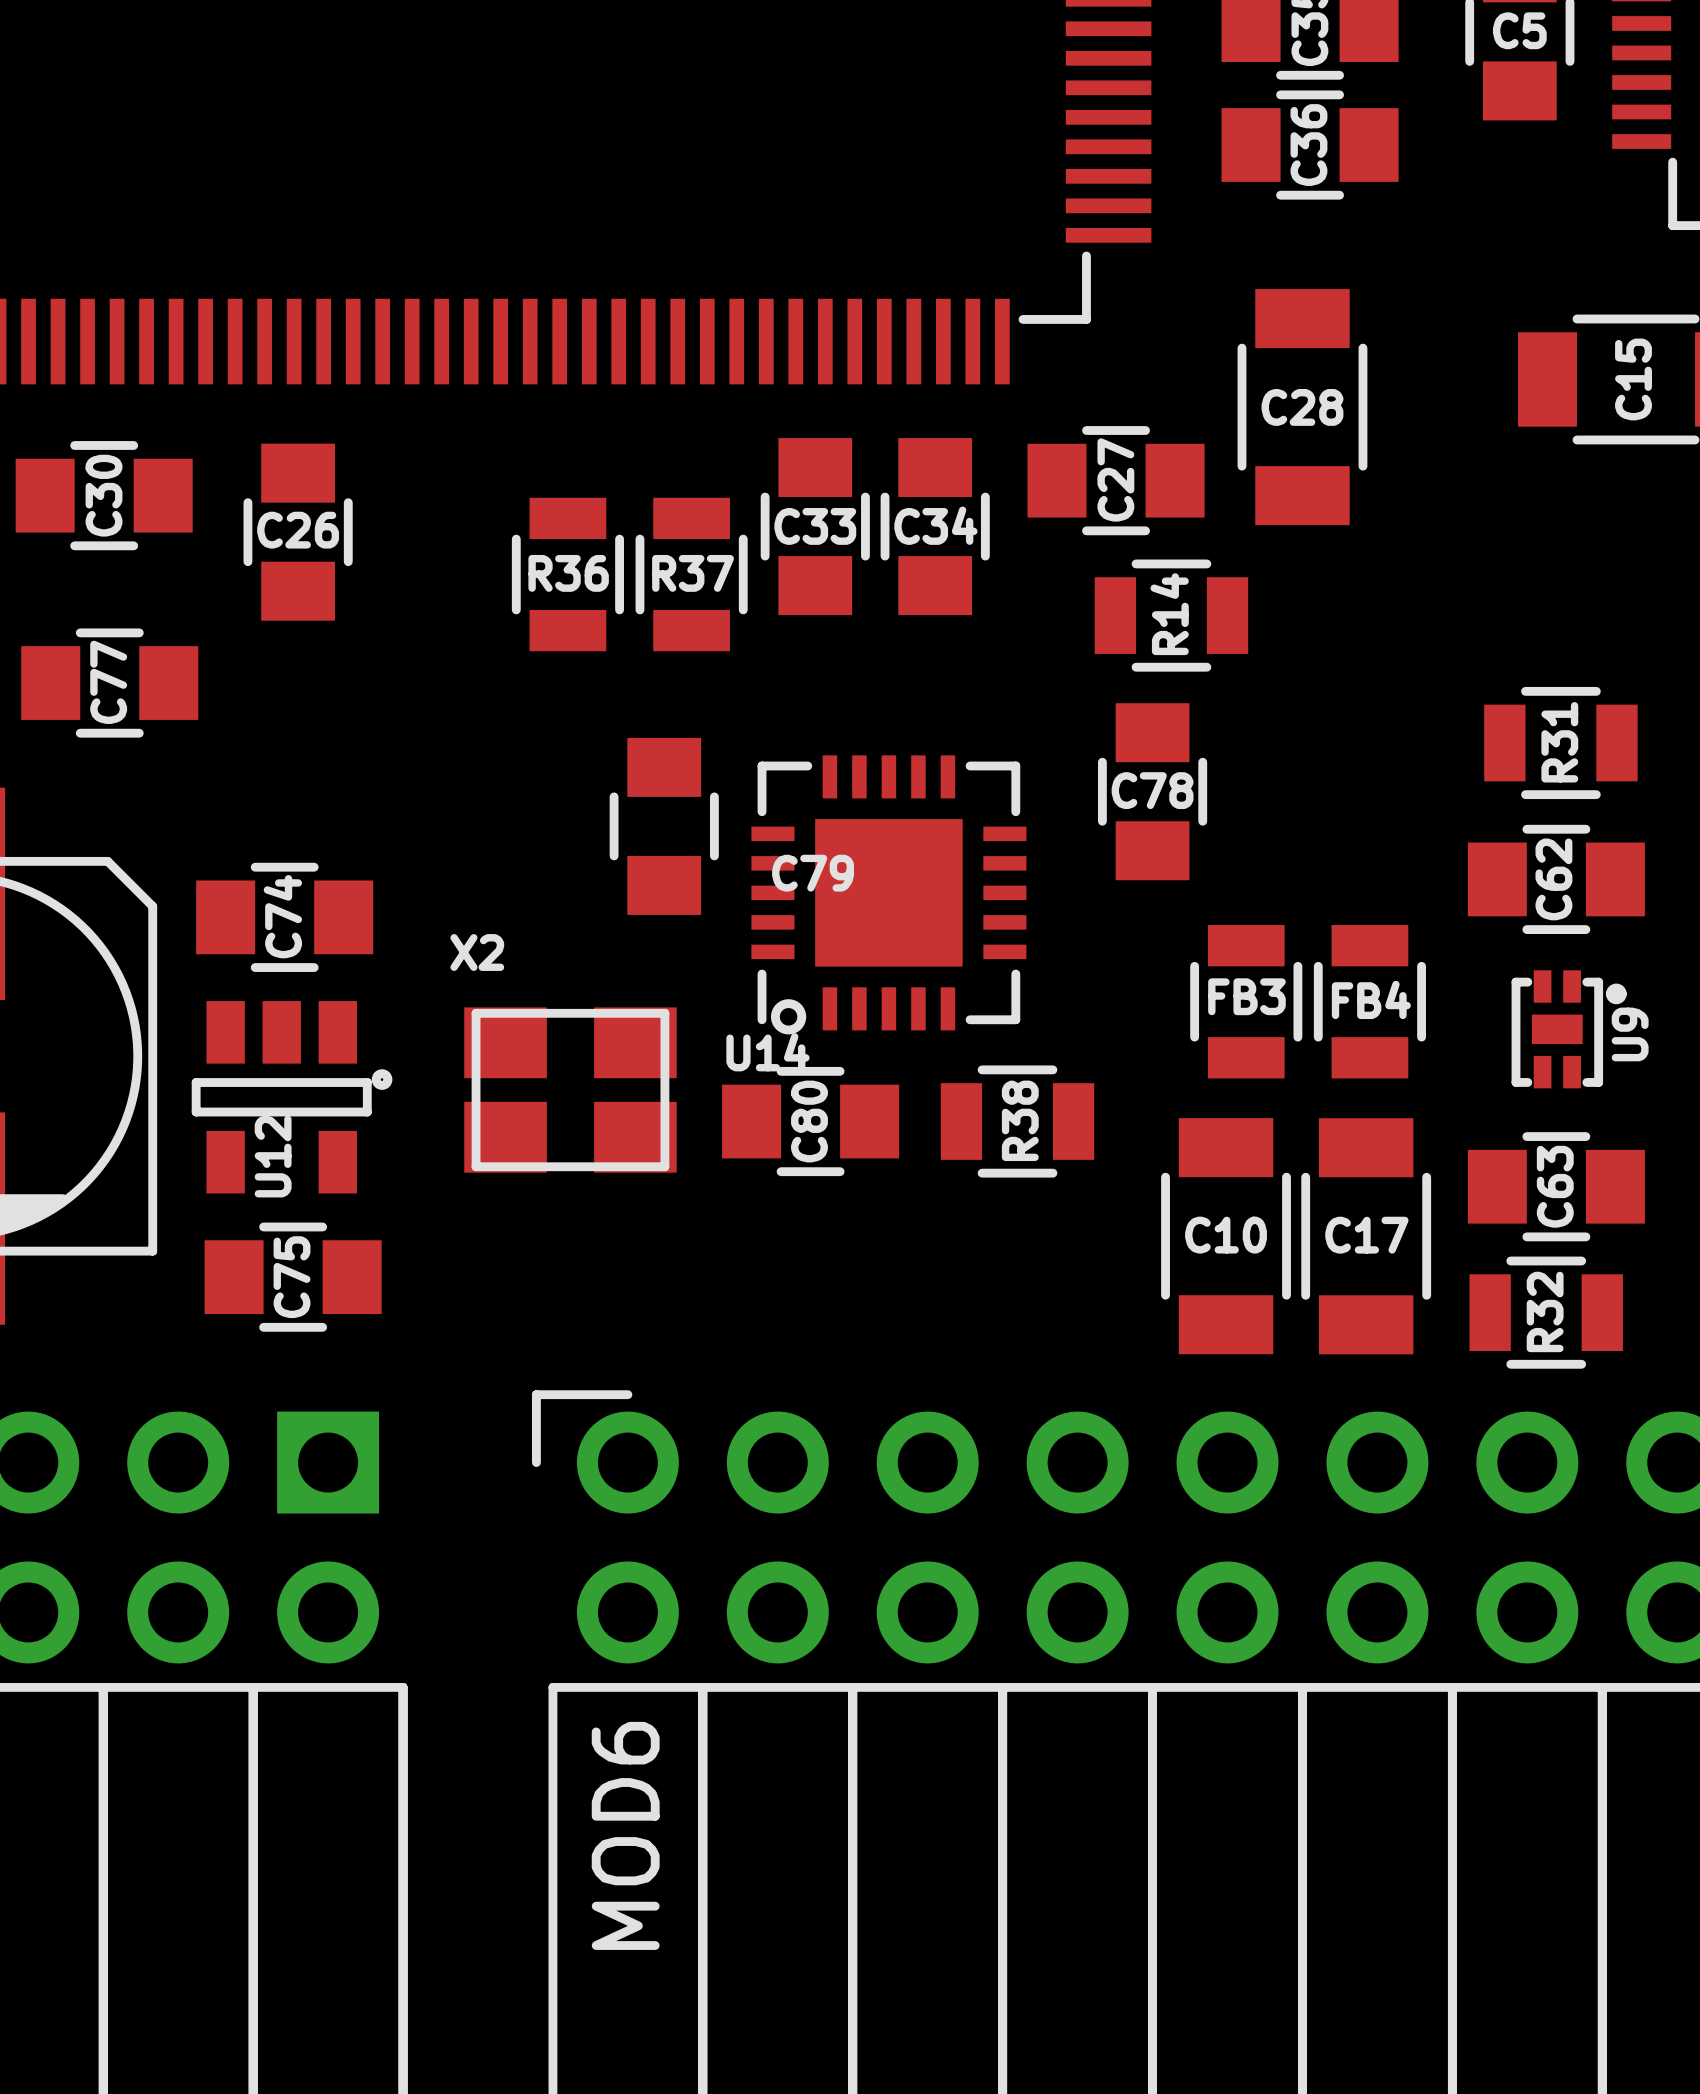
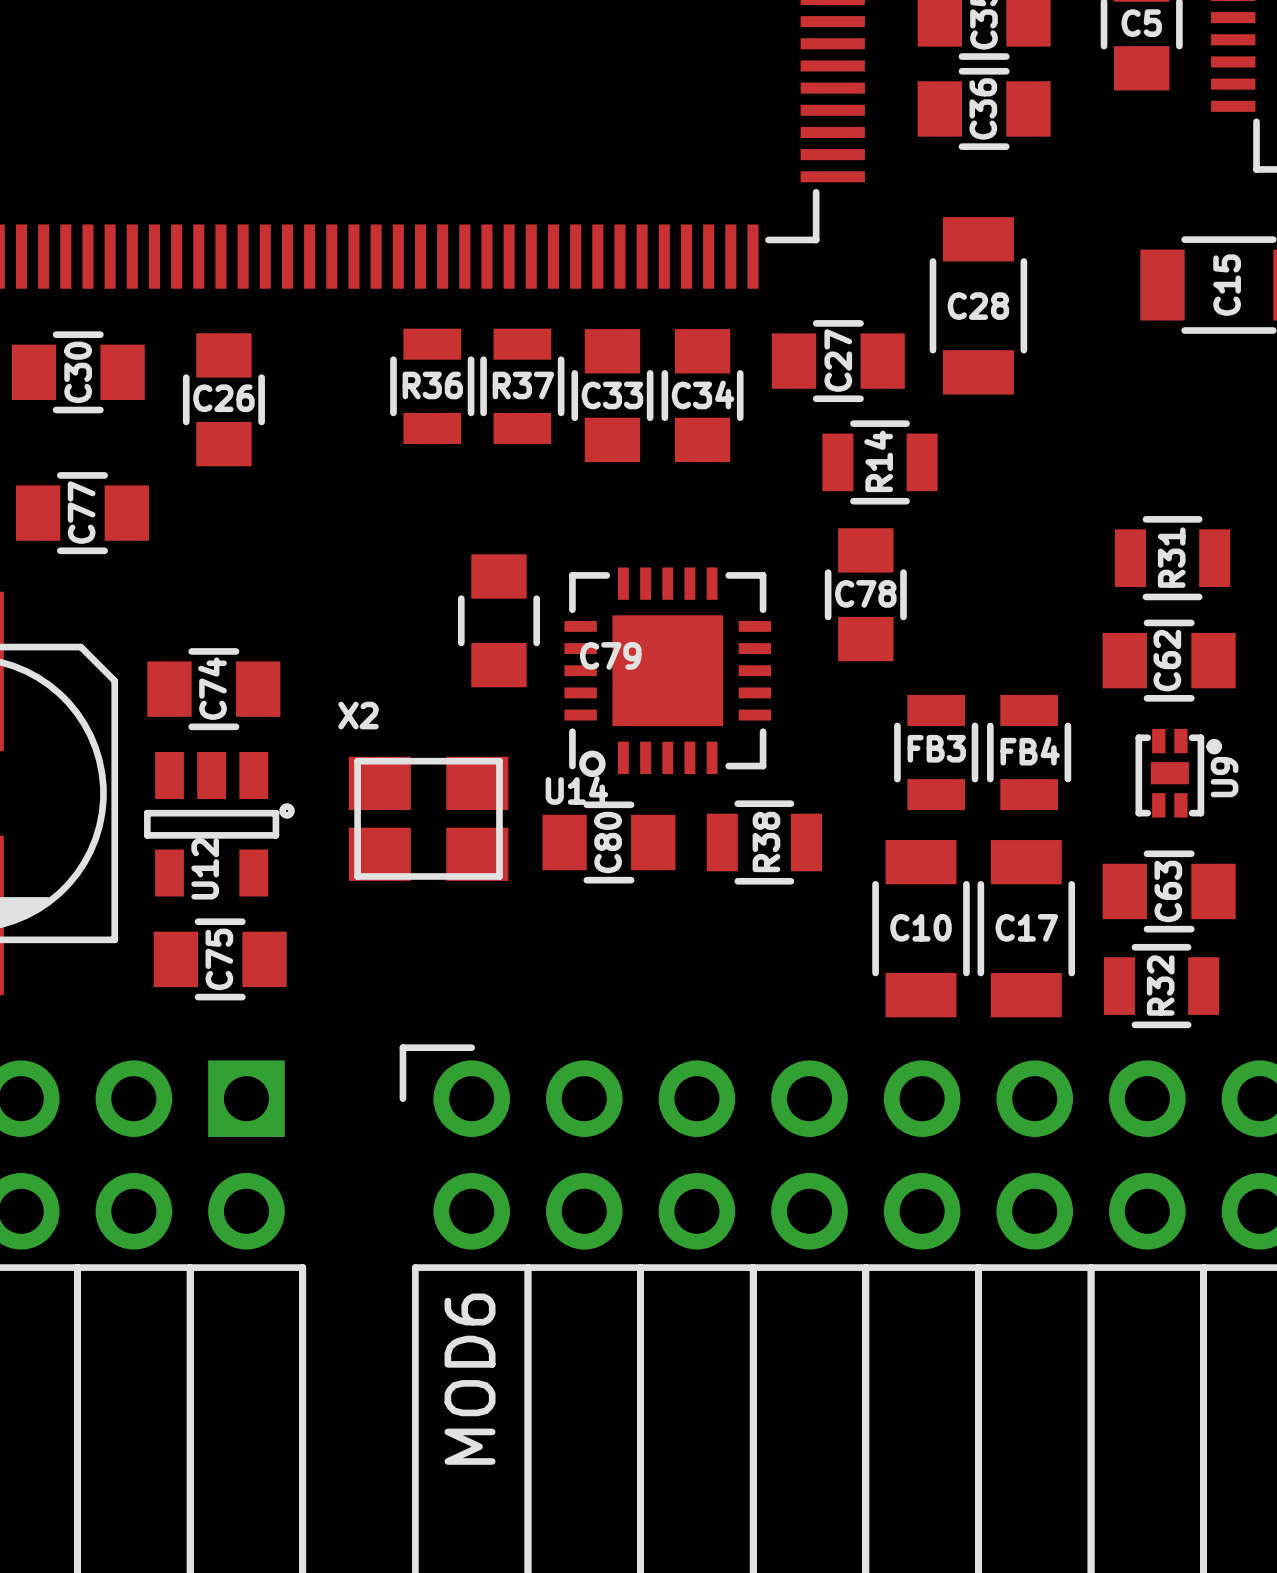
R36 position: (567, 574) -> (432, 386)
R37 position: (691, 574) -> (522, 386)

